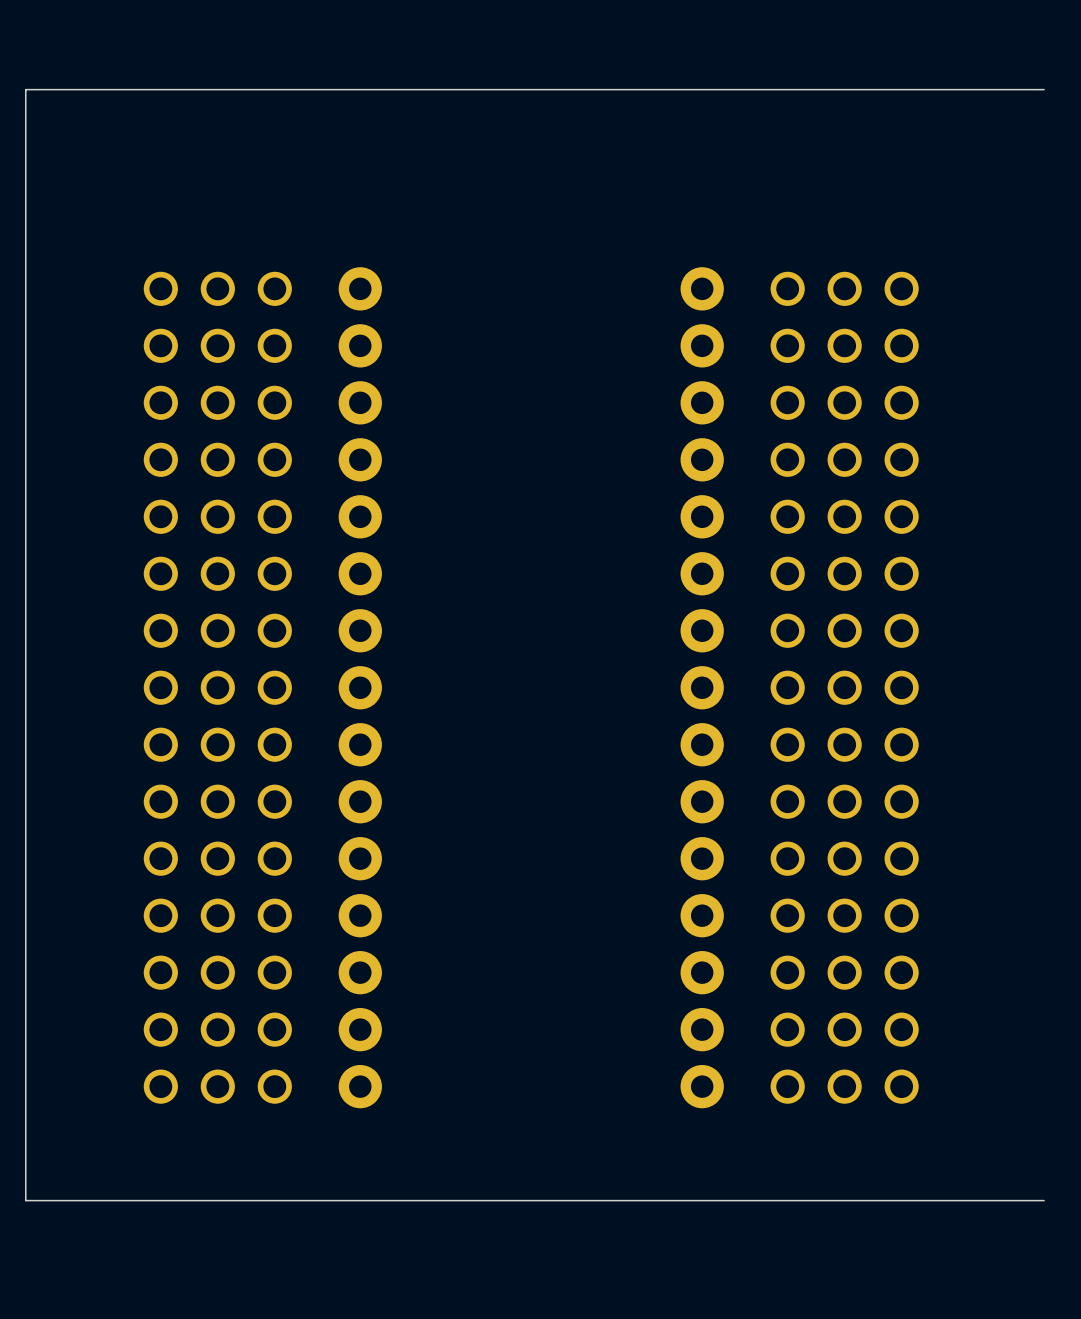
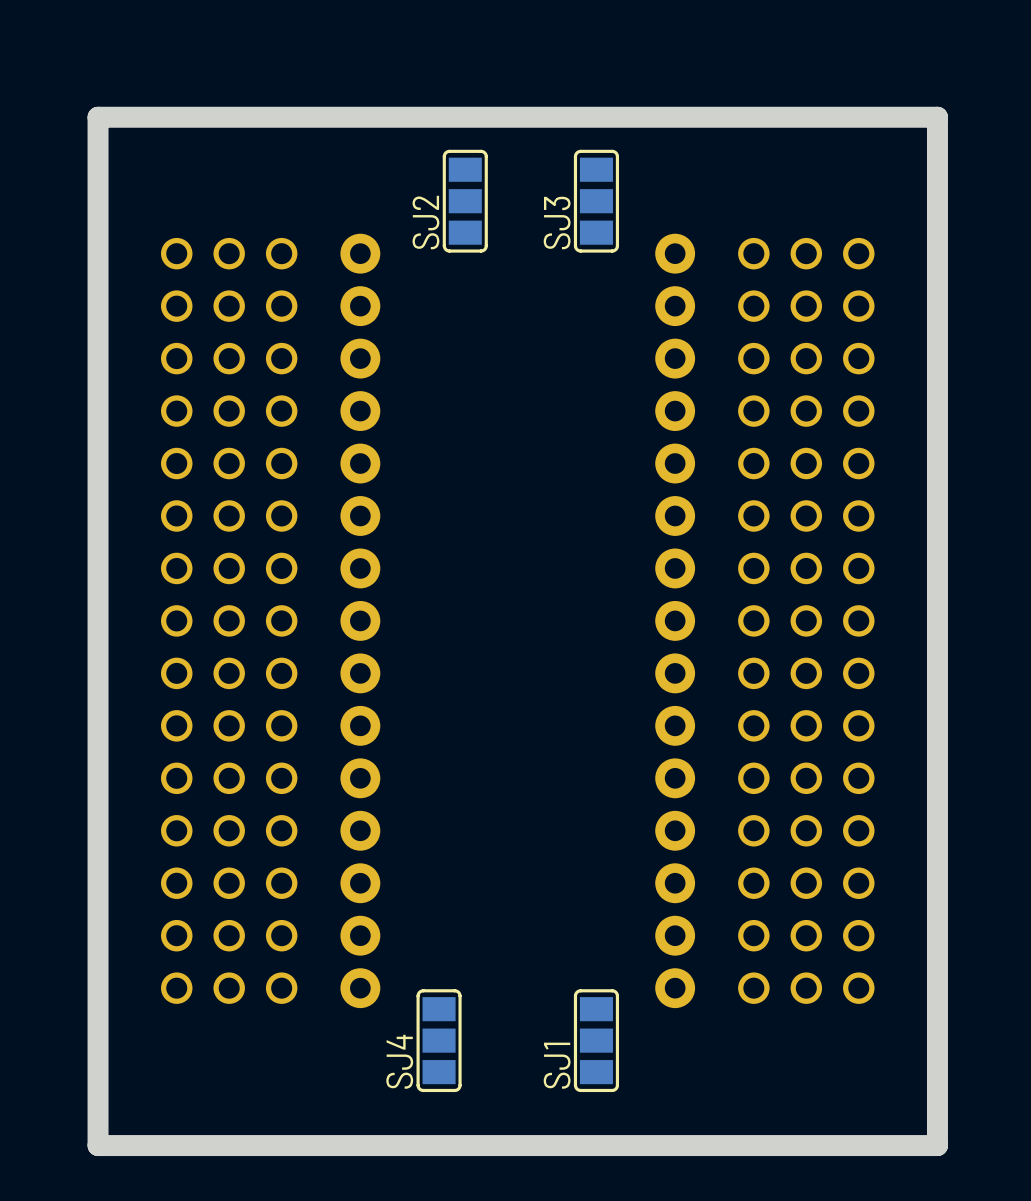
board edge: (1044, 89) (25, 89) (25, 1200) (1044, 1200) -> none
board edge: none -> (104, 122) (104, 1145) (937, 1145)
SJ2: none -> (465, 201)
SJ3: none -> (596, 201)
SJ4: none -> (439, 1040)
SJ1: none -> (596, 1040)
board edge: none -> (937, 1145) (937, 117) (98, 117) (98, 1145) (937, 1145)

